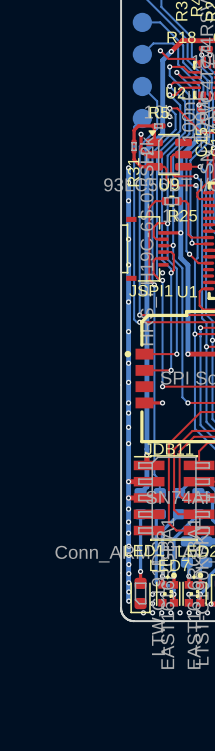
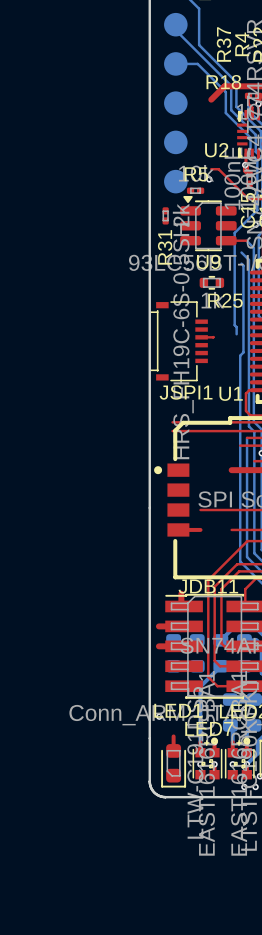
top track: (160, 50) (168, 58) (194, 58) (199, 64) -> none
via: (160, 50) -> none
bottom track: (171, 51) (162, 60) (162, 133) (146, 149) (146, 486) (140, 493) -> none
via: (171, 51) -> none
bottom track: (142, 54) (153, 43) (173, 43) (178, 48) (178, 64) (198, 85) (198, 96) (204, 102) (204, 140) (186, 158) (186, 251) (189, 254) -> none
via: (201, 55) -> none
top track: (169, 66) (183, 66) (188, 72) (196, 72) -> none
bottom track: (169, 66) (169, 75) (189, 95) (189, 133) (167, 155) (167, 259) (176, 268) (176, 355) -> none
via: (169, 66) -> none
top track: (176, 72) (181, 77) (196, 77) -> none
bottom track: (176, 72) (193, 89) (193, 135) (173, 156) (173, 258) (182, 268) (182, 397) (187, 402) -> none
via: (176, 72) -> none
top track: (196, 82) (173, 82) (169, 86) -> none
bottom track: (142, 86) (157, 101) (157, 128) (139, 146) (139, 315) -> none
bottom track: (169, 86) (185, 101) (185, 132) (162, 155) (162, 259) (171, 269) (171, 370) -> none
via: (169, 86) -> none
top track: (196, 87) (182, 87) (175, 94) (169, 94) -> none
bottom track: (169, 94) (180, 105) (180, 131) (156, 154) (156, 277) (162, 280) (162, 386) -> none
via: (169, 94) -> none
bottom track: (198, 105) (198, 138) (180, 156) (180, 257) (187, 265) (187, 354) -> none
bottom track: (169, 108) (175, 114) (175, 129) (152, 152) (154, 474) (159, 480) (159, 493) -> none
via: (169, 108) -> none
bottom track: (142, 118) (134, 126) (134, 319) (139, 322) -> none
via: (169, 124) -> none
top track: (141, 134) (141, 149) (145, 154) (154, 154) -> none
via: (141, 134) -> none
top track: (134, 142) (134, 130) (138, 125) (154, 125) (154, 142) -> none
top track: (134, 150) (134, 159) (141, 166) (164, 166) (166, 168) (166, 179) (172, 185) (196, 185) -> none
top track: (207, 153) (207, 182) (197, 192) (197, 196) (199, 199) (208, 199) -> none
top track: (183, 154) (173, 154) (171, 157) (171, 172) (174, 176) (196, 176) -> none
via: (200, 166) -> none
bottom track: (128, 167) (128, 601) -> none
via: (128, 167) -> none
via: (196, 176) -> none
via: (128, 182) -> none
via: (196, 185) -> none
via: (128, 200) -> none
top track: (165, 201) (155, 201) (149, 207) (149, 279) (154, 284) -> none
top track: (178, 201) (185, 201) (188, 203) (188, 234) (191, 237) (208, 237) -> none
top track: (167, 223) (157, 223) (153, 227) (153, 236) (156, 239) (163, 239) -> none
via: (167, 223) -> none
top track: (163, 232) (180, 232) -> none
via: (180, 232) -> none
via: (128, 239) -> none
top track: (192, 243) (208, 243) -> none
via: (192, 243) -> none
via: (173, 245) -> none
top track: (163, 252) (171, 252) (173, 254) (173, 270) (171, 272) -> none
top track: (189, 254) (198, 263) (208, 263) -> none
via: (189, 254) -> none
top track: (163, 258) (155, 258) (153, 260) (153, 273) (160, 280) (163, 280) -> none
via: (128, 264) -> none
via: (162, 272) -> none
via: (171, 272) -> none
via: (162, 280) -> none
via: (154, 284) -> none
via: (128, 302) -> none
via: (139, 315) -> none
via: (139, 322) -> none
via: (200, 327) -> none
via: (128, 331) -> none
via: (194, 334) -> none
via: (206, 346) -> none
top track: (144, 354) (176, 354) -> none
via: (176, 354) -> none
via: (187, 354) -> none
via: (128, 363) -> none
top track: (144, 370) (171, 370) -> none
via: (171, 370) -> none
via: (128, 382) -> none
via: (162, 386) -> none
via: (128, 402) -> none
via: (162, 402) -> none
via: (187, 402) -> none
via: (128, 413) -> none
via: (128, 427) -> none
via: (128, 443) -> none
via: (146, 455) -> none
via: (128, 481) -> none
via: (128, 497) -> none
via: (128, 509) -> none
bottom track: (140, 514) (140, 571) -> none
bottom track: (159, 514) (156, 517) (156, 582) (159, 585) (170, 585) (173, 589) (173, 594) -> none
bottom track: (198, 514) (173, 538) (173, 576) -> none
via: (128, 522) -> none
via: (128, 533) -> none
via: (128, 546) -> none
via: (128, 564) -> none
via: (140, 571) -> none
via: (128, 573) -> none
via: (162, 576) -> none
via: (188, 576) -> none
via: (128, 582) -> none
via: (128, 591) -> none
via: (152, 594) -> none
via: (128, 601) -> none
via: (152, 603) -> none
via: (143, 612) -> none
via: (152, 612) -> none
via: (161, 612) -> none
via: (170, 612) -> none
via: (180, 612) -> none
via: (189, 612) -> none

